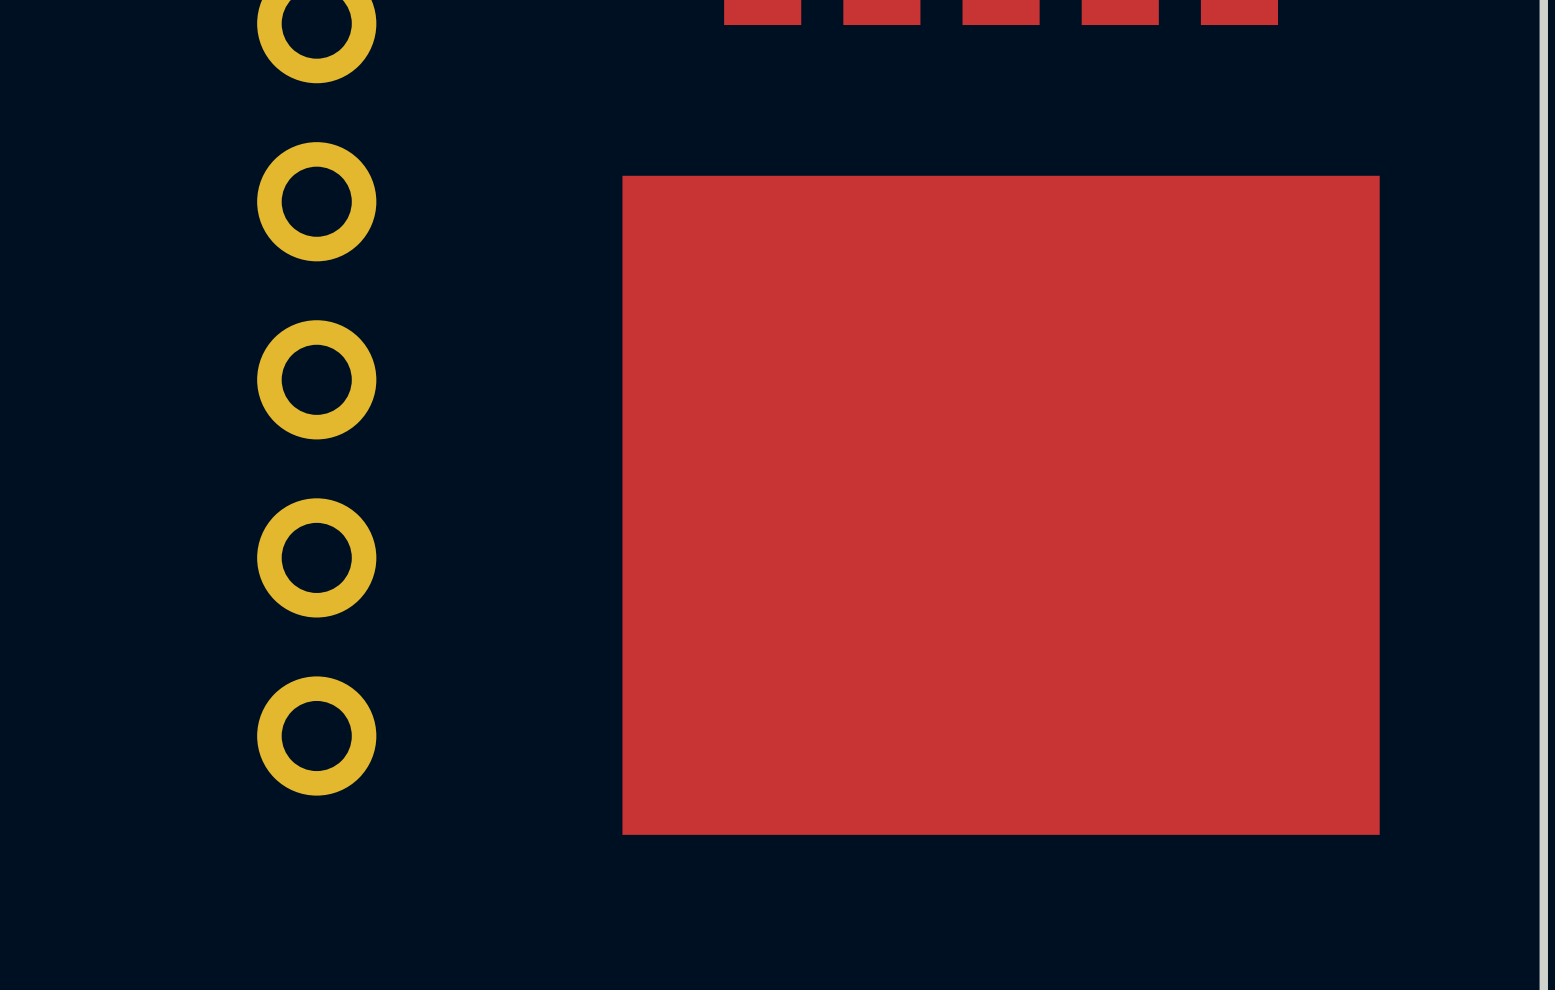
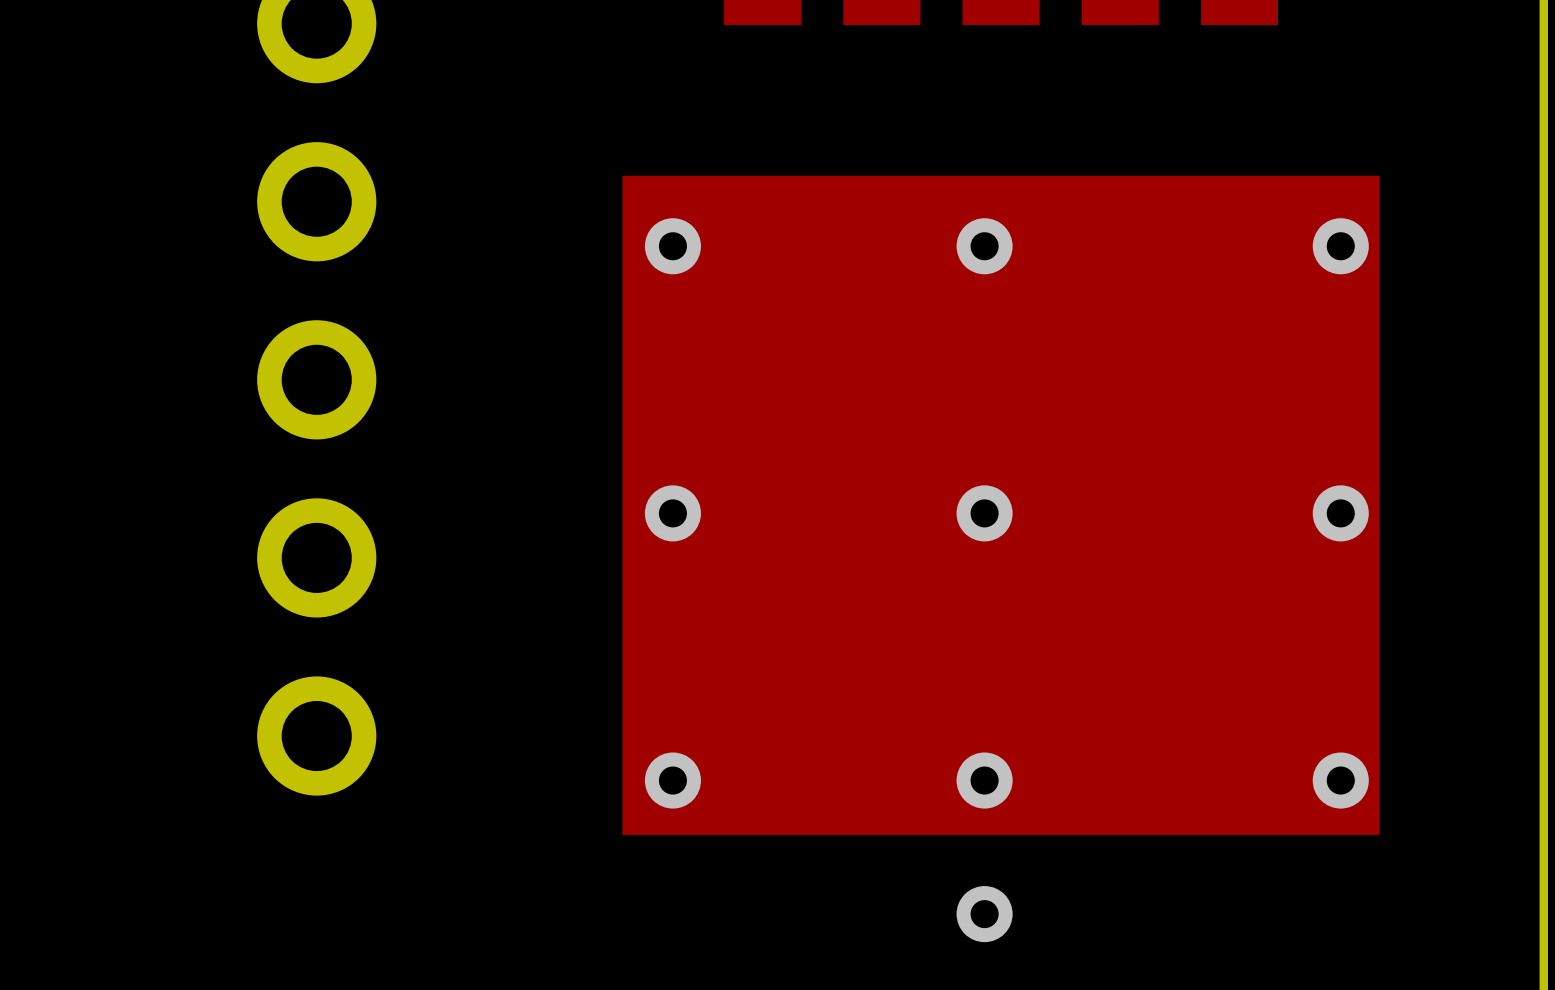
via: none -> (672, 246)
via: none -> (984, 246)
via: none -> (1340, 246)
via: none -> (672, 513)
via: none -> (984, 513)
via: none -> (1340, 513)
via: none -> (672, 780)
via: none -> (984, 780)
via: none -> (1340, 780)
via: none -> (984, 914)

